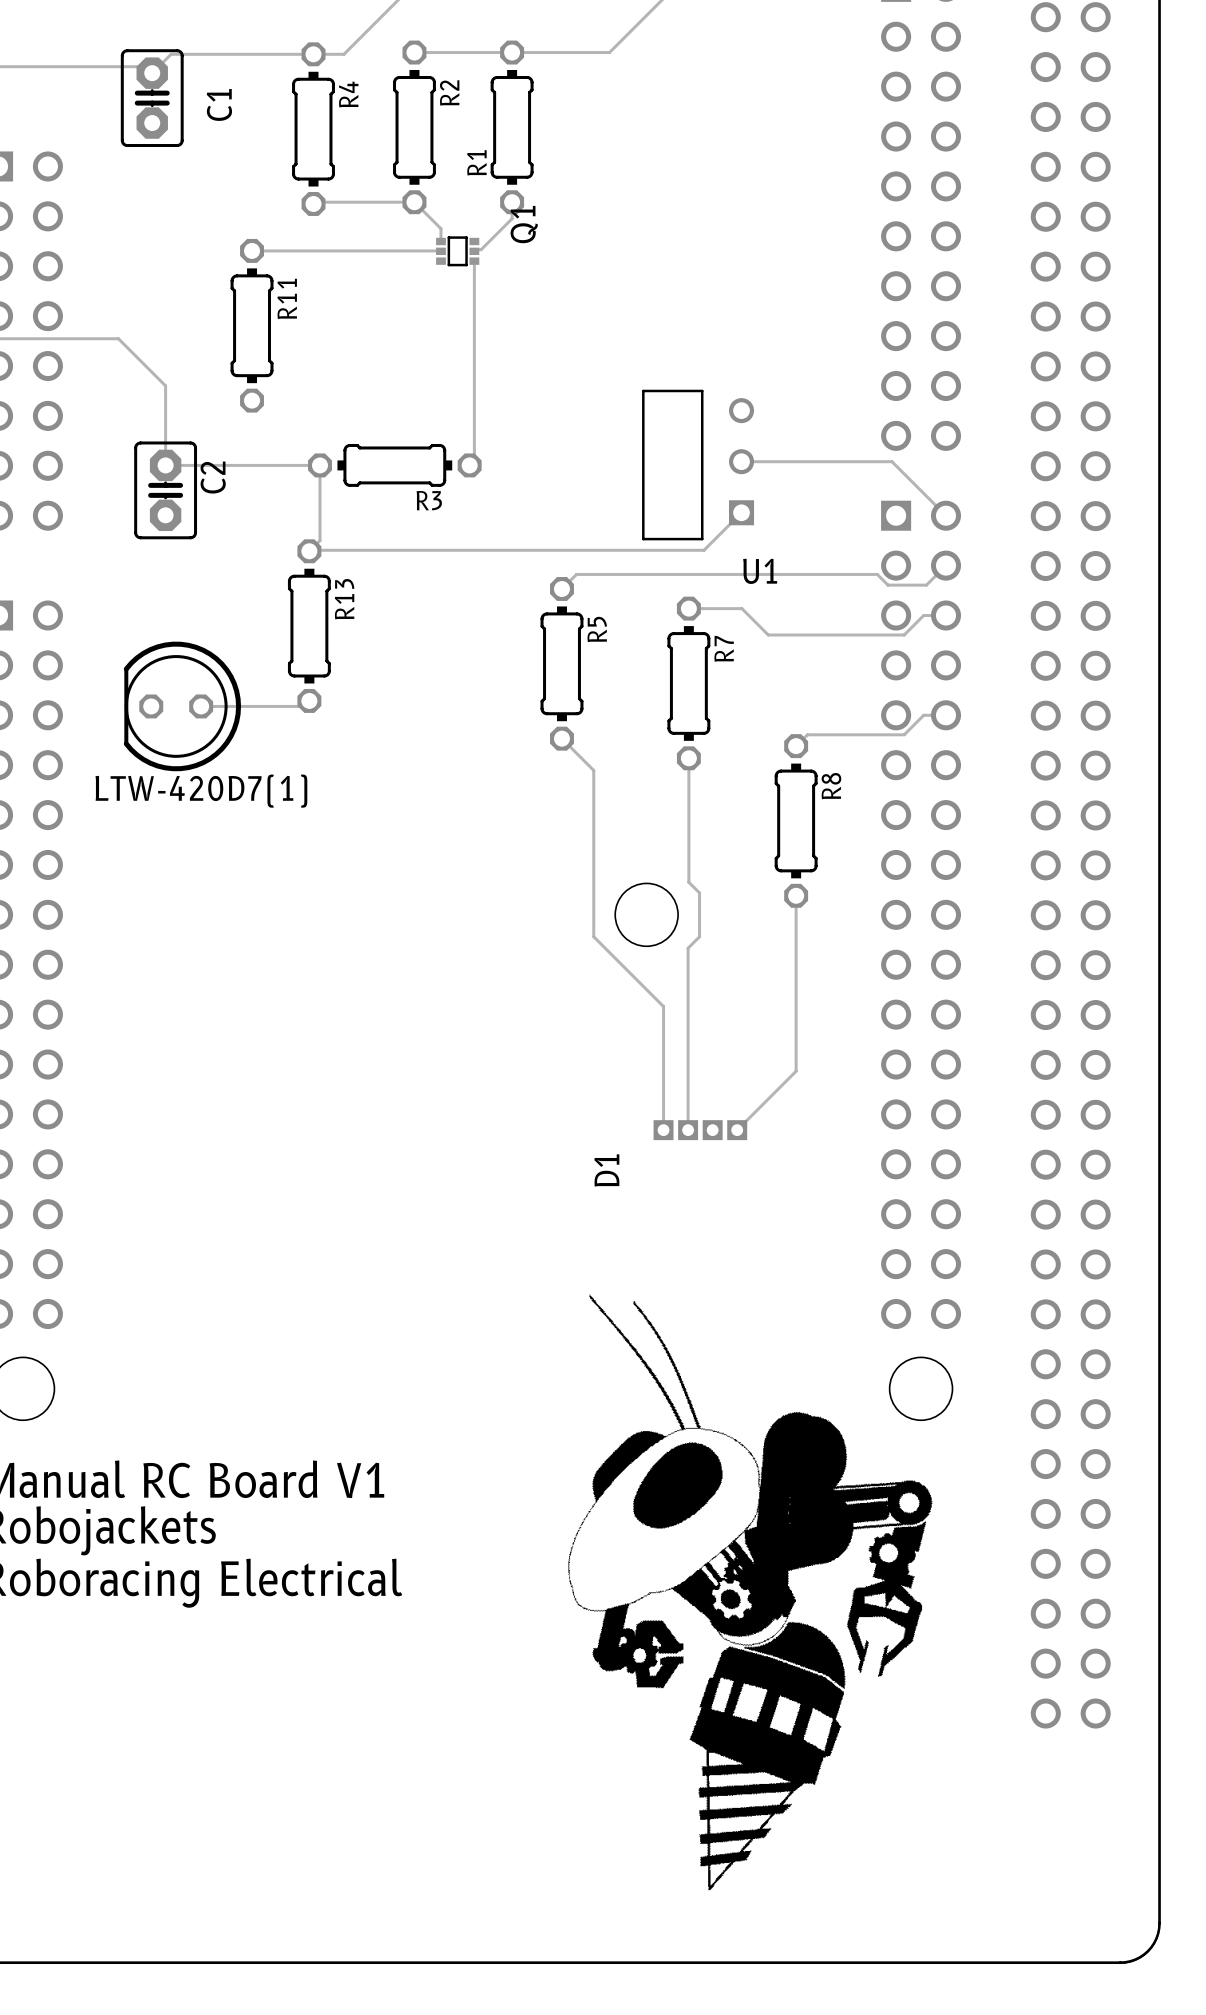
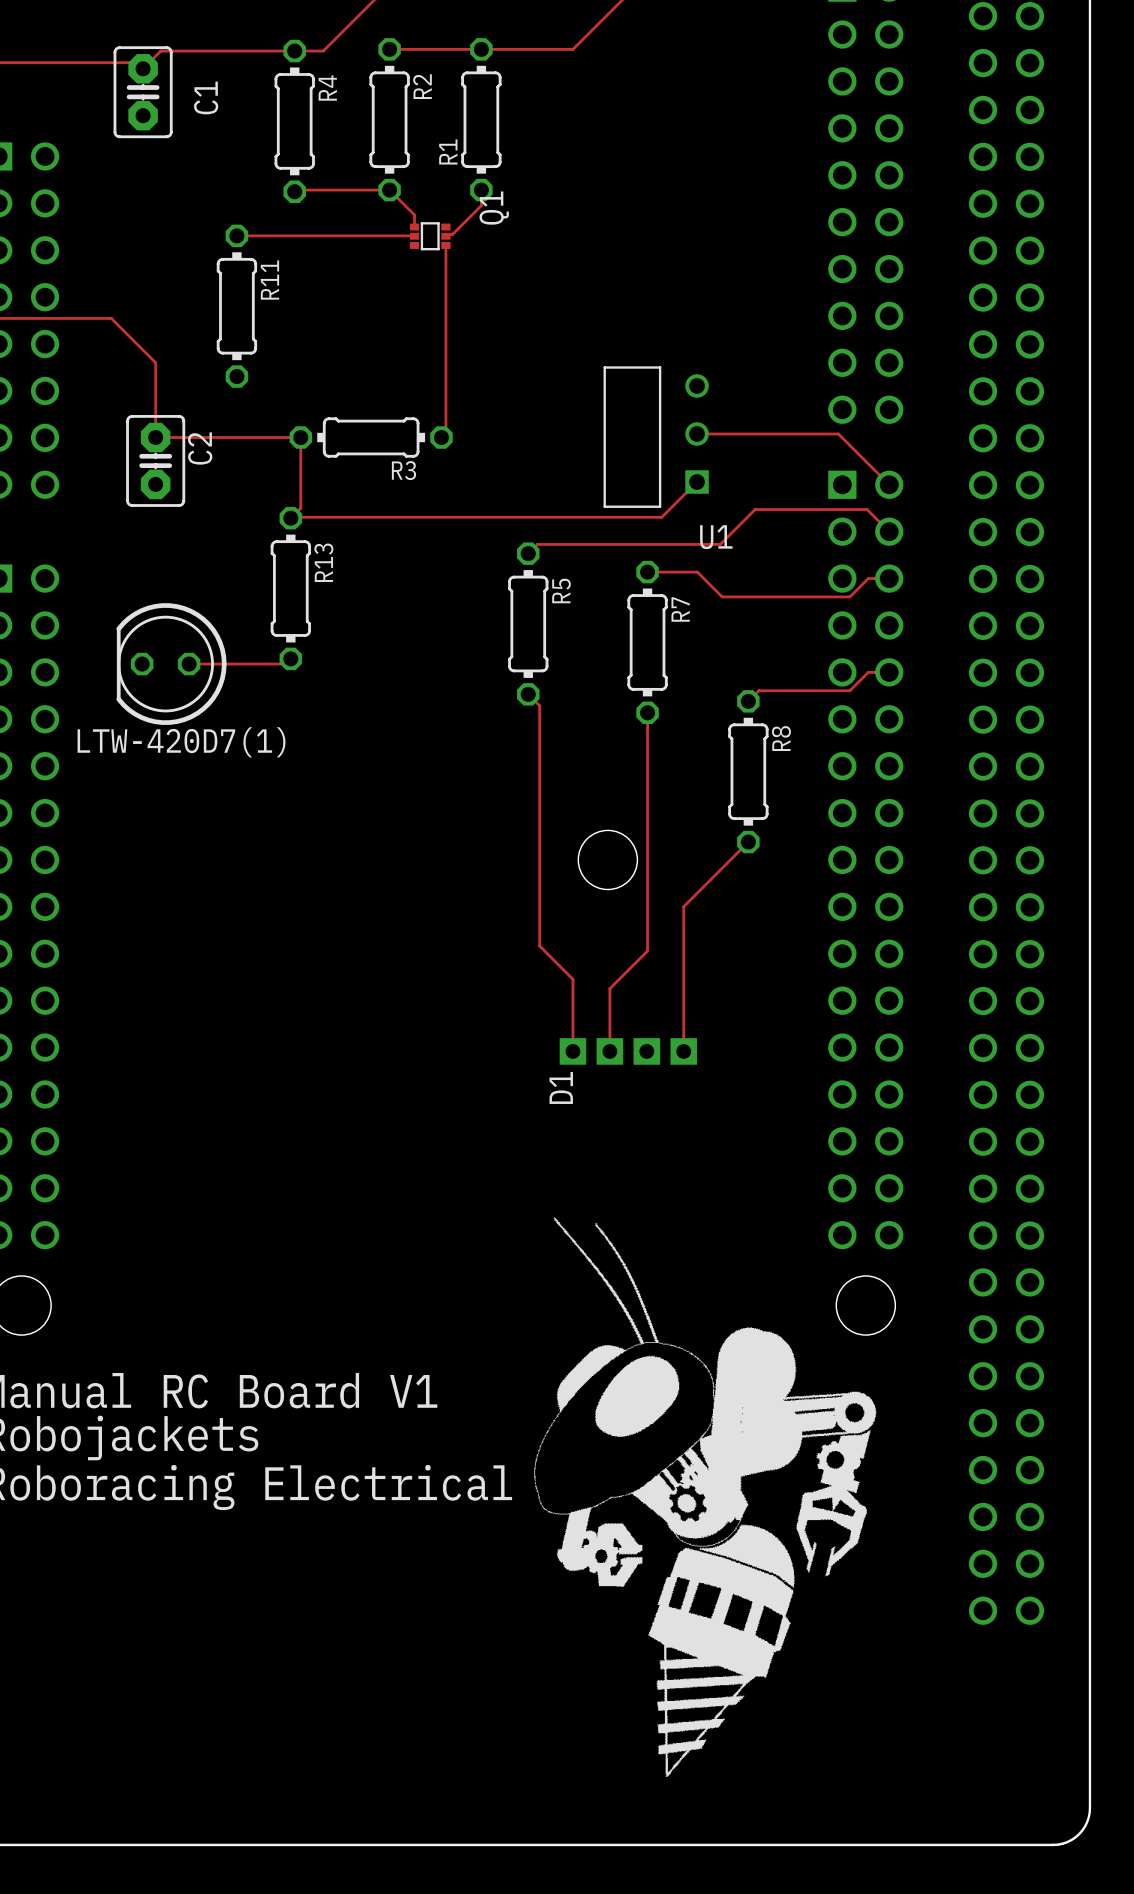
track: (946, 565) (926, 585) (888, 585) (877, 574) (576, 574) (571, 579) -> (889, 531) (867, 509) (755, 509) (720, 544) (537, 544)
track: (574, 750) (593, 770) (593, 936) (663, 1006) (663, 1130) -> (539, 705) (539, 946) (572, 979) (572, 1051)
track: (688, 882) (699, 892) (699, 936) (688, 948) (688, 1130) -> (647, 829) (647, 951) (609, 988) (609, 1051)
track: (796, 895) (796, 1071) (737, 1130) -> (748, 842) (683, 906) (683, 1051)
D1 footprint: [653, 1120, 748, 1141] -> [559, 1038, 698, 1065]

